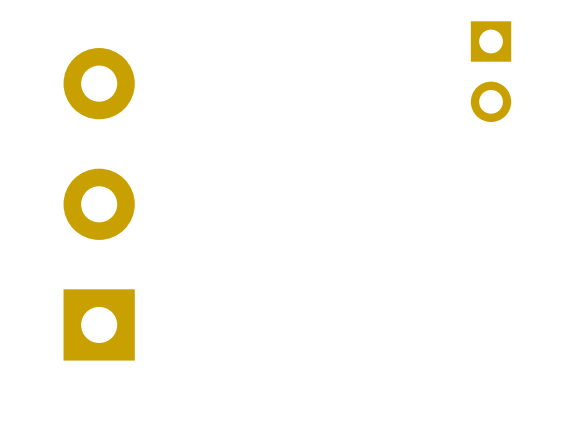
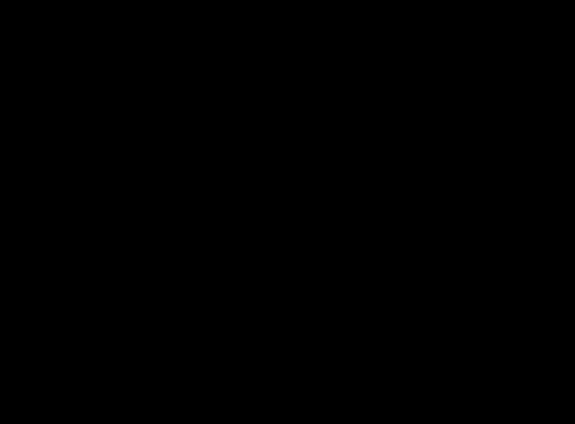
part: (491, 71) -> none
part: (99, 204) -> none

